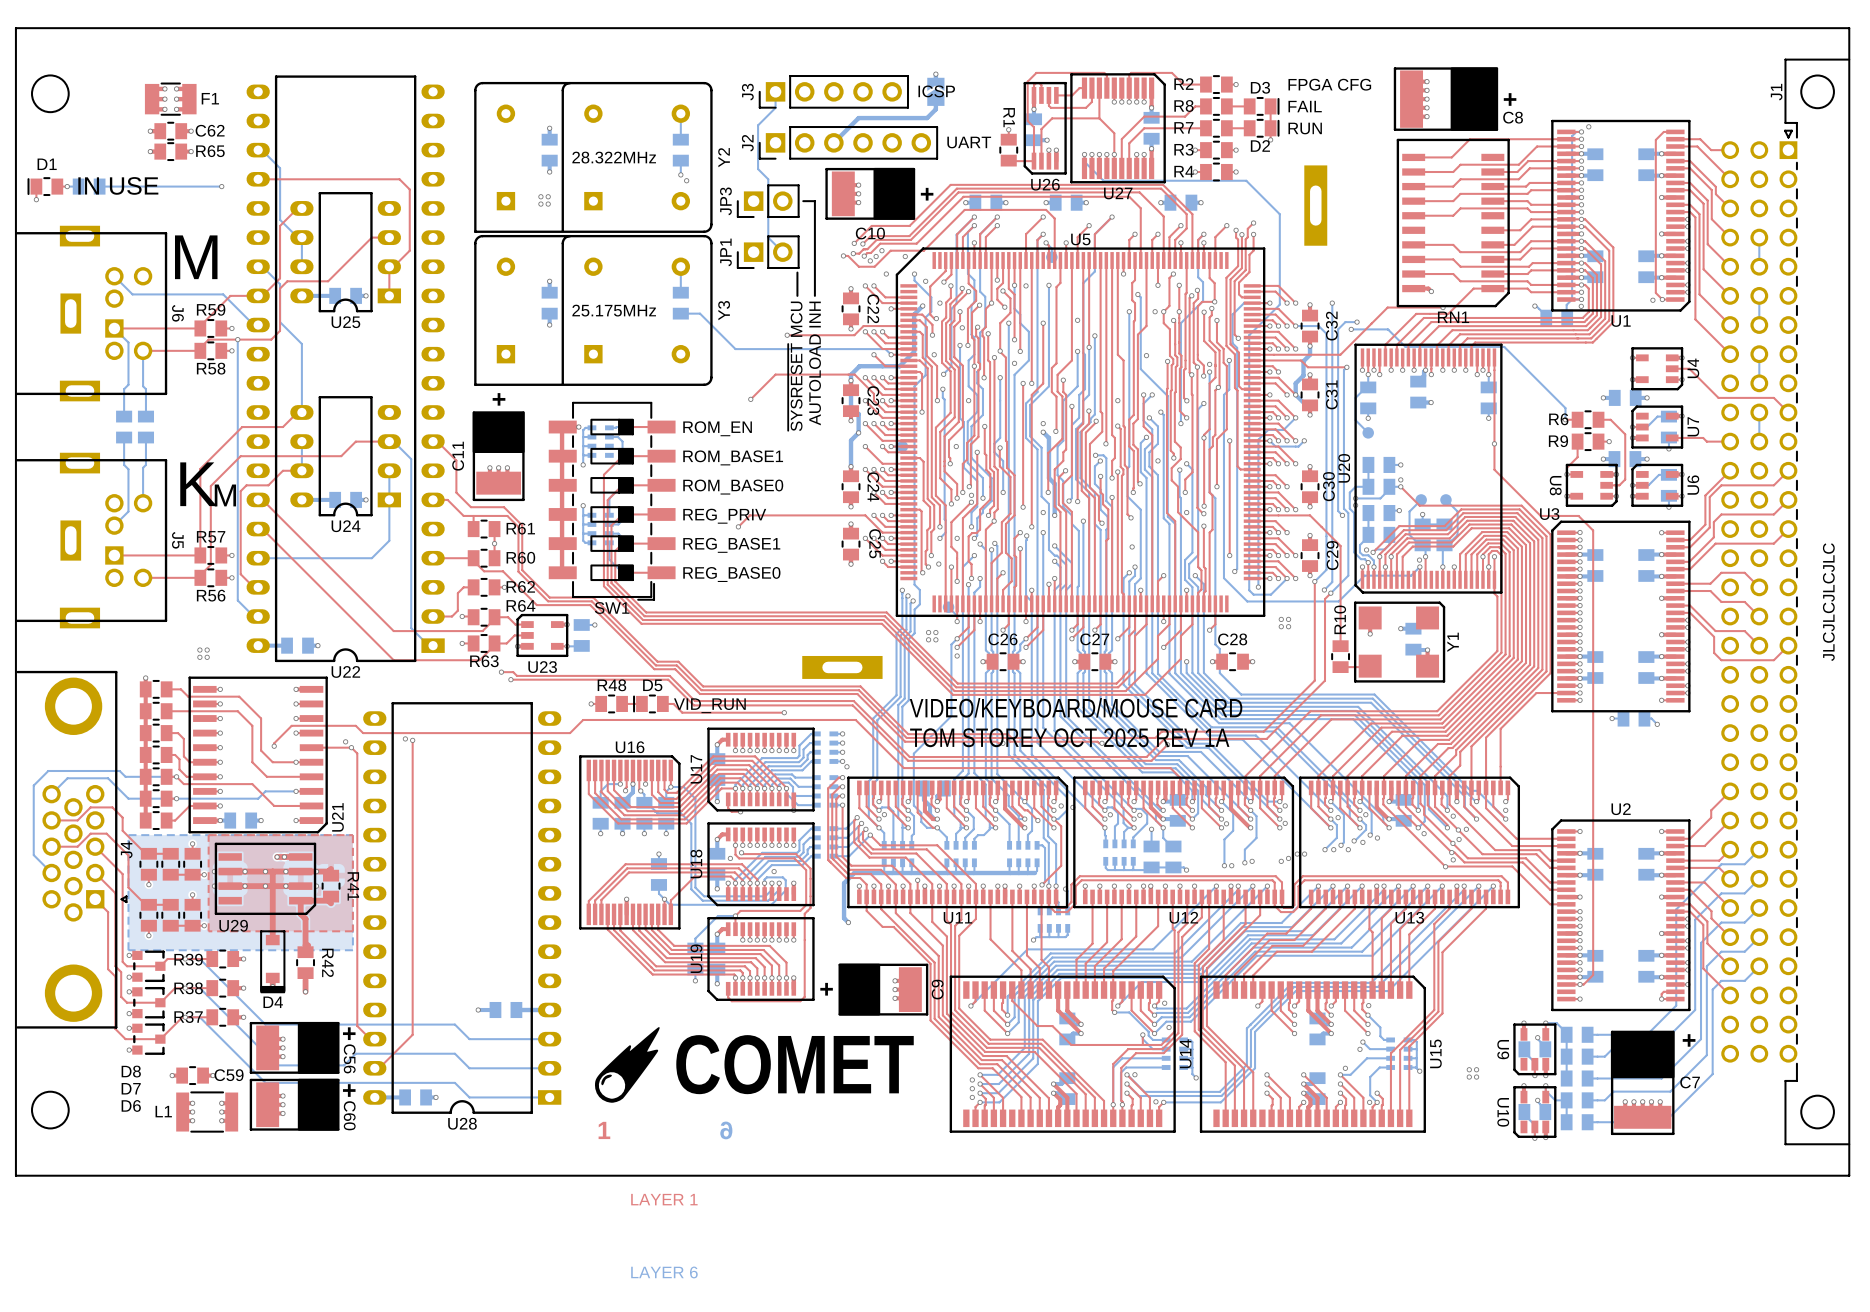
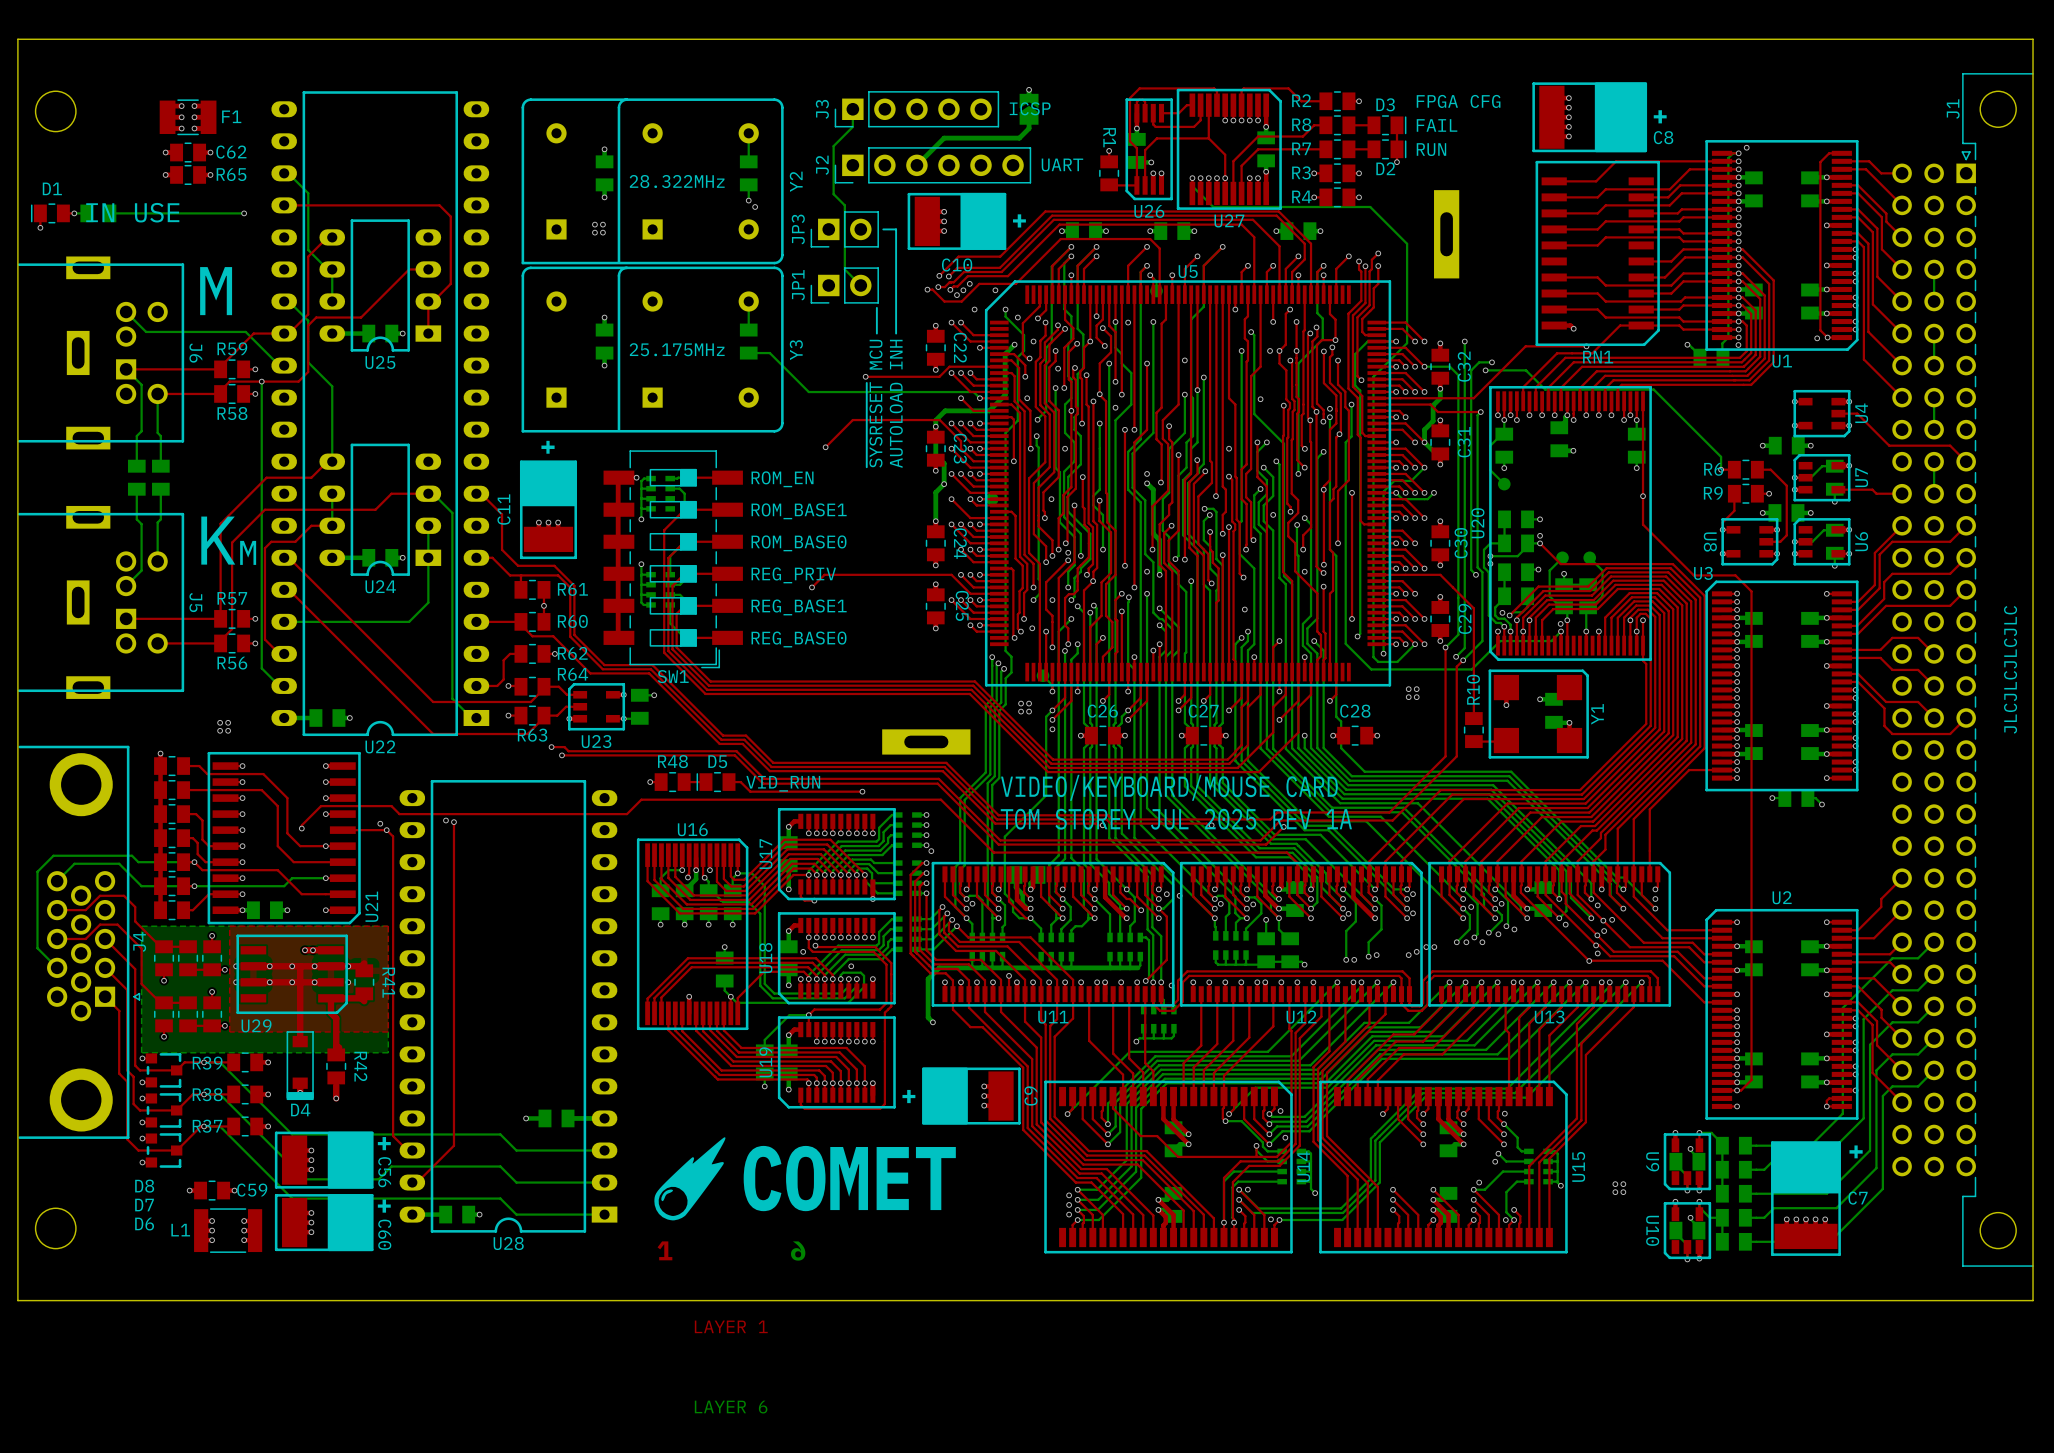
text: TOM STOREY OCT 2025 REV 1A (1069, 737) -> TOM STOREY JUL 2025 REV 1A (1176, 819)

